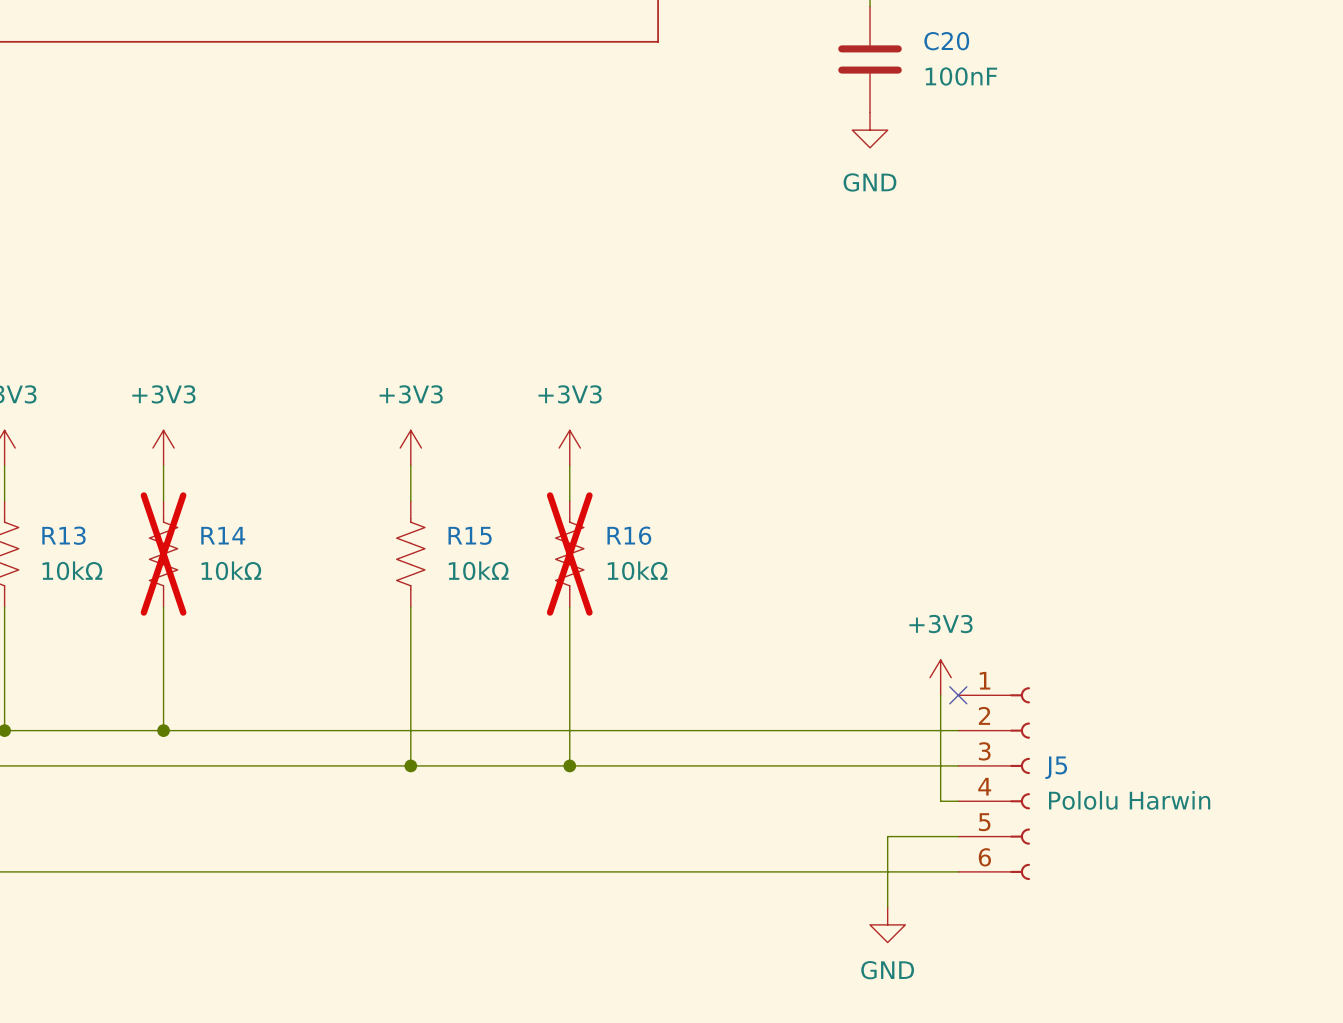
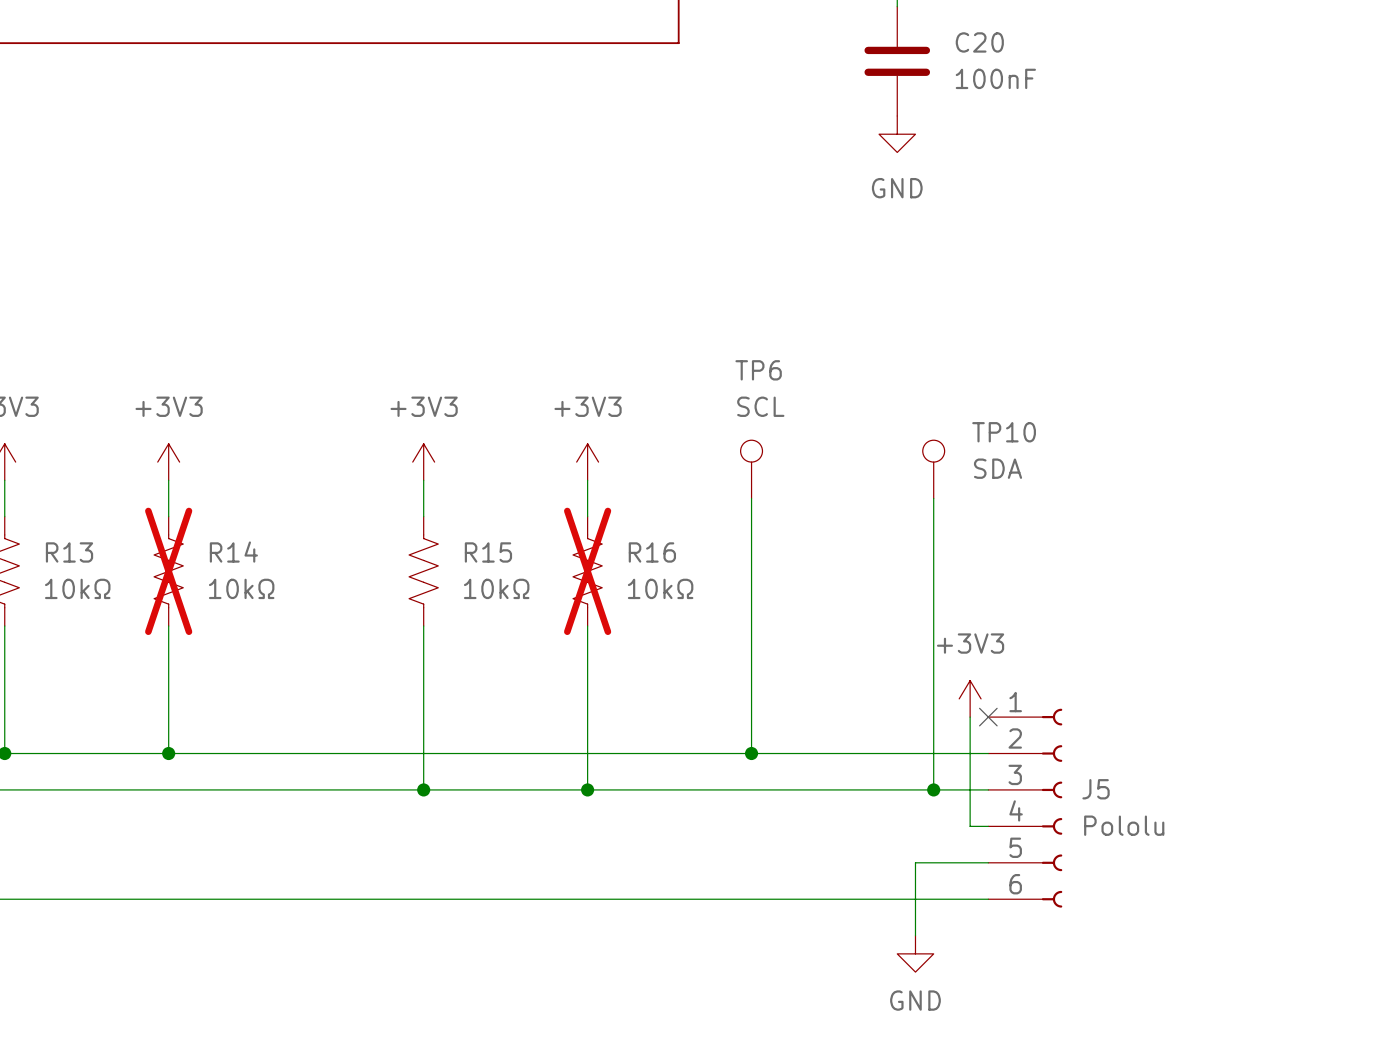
TP6: none -> SCL (751, 469)
TP10: none -> SDA (933, 469)
wire: none -> (751, 498) (751, 753)
wire: none -> (933, 498) (933, 789)
junction: none -> (751, 753)
junction: none -> (933, 789)
J5 value: Pololu Harwin (1129, 800) -> Pololu (1124, 825)

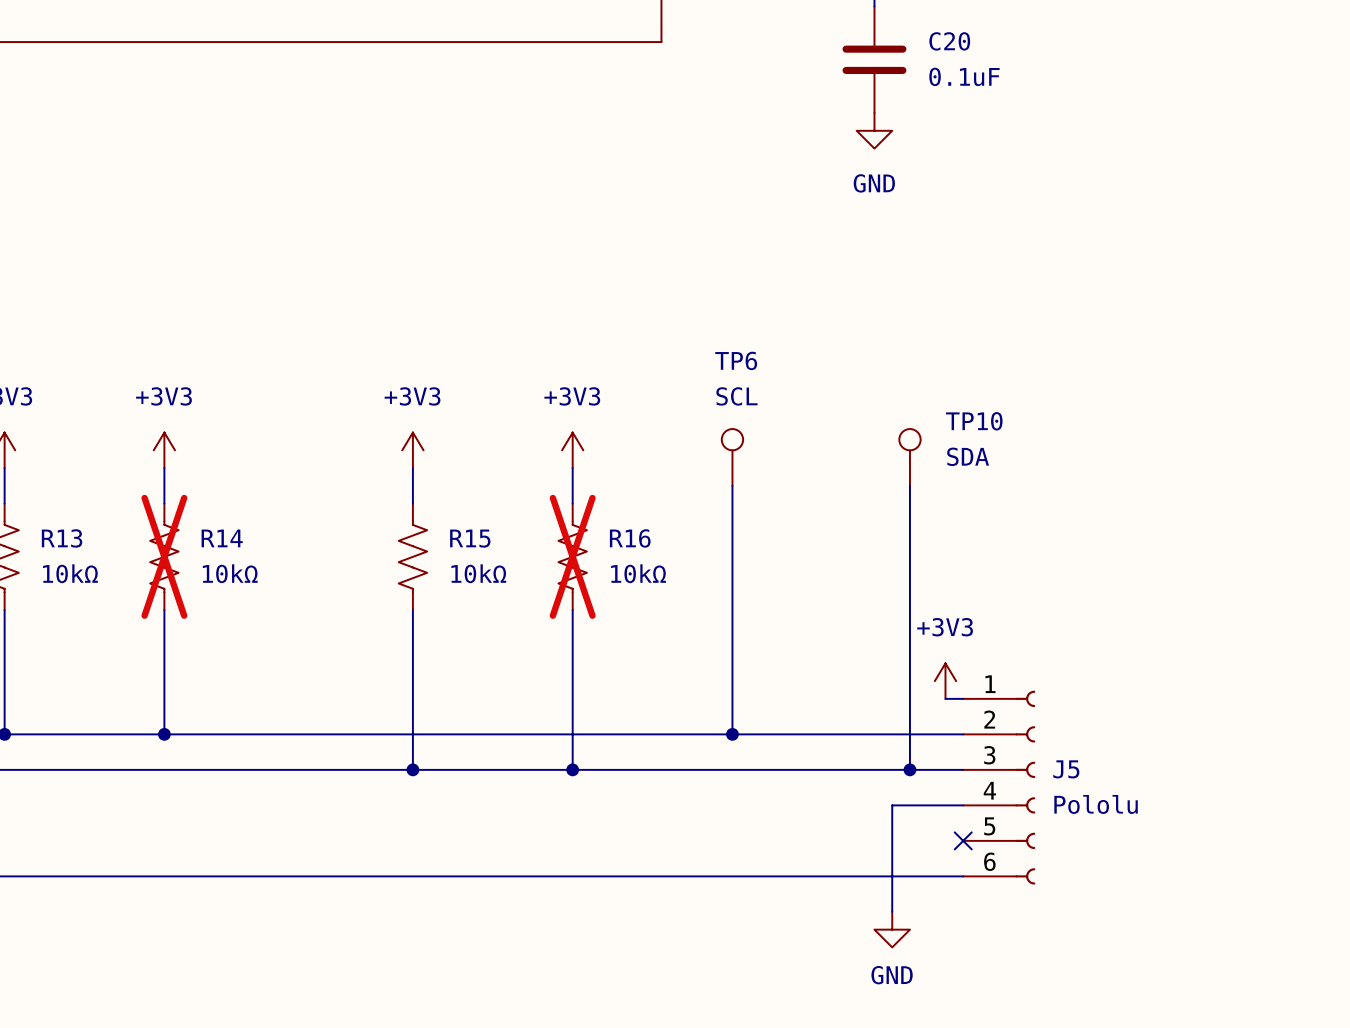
C20 value: 100nF (995, 78) -> 0.1uF (964, 76)
wire: (970, 717) (970, 826) -> (945, 698) (963, 698)
no-connect mark: (988, 717) -> none
wire: (915, 862) (988, 862) -> (892, 840) (892, 805) (945, 805)
no-connect mark: none -> (963, 840)

